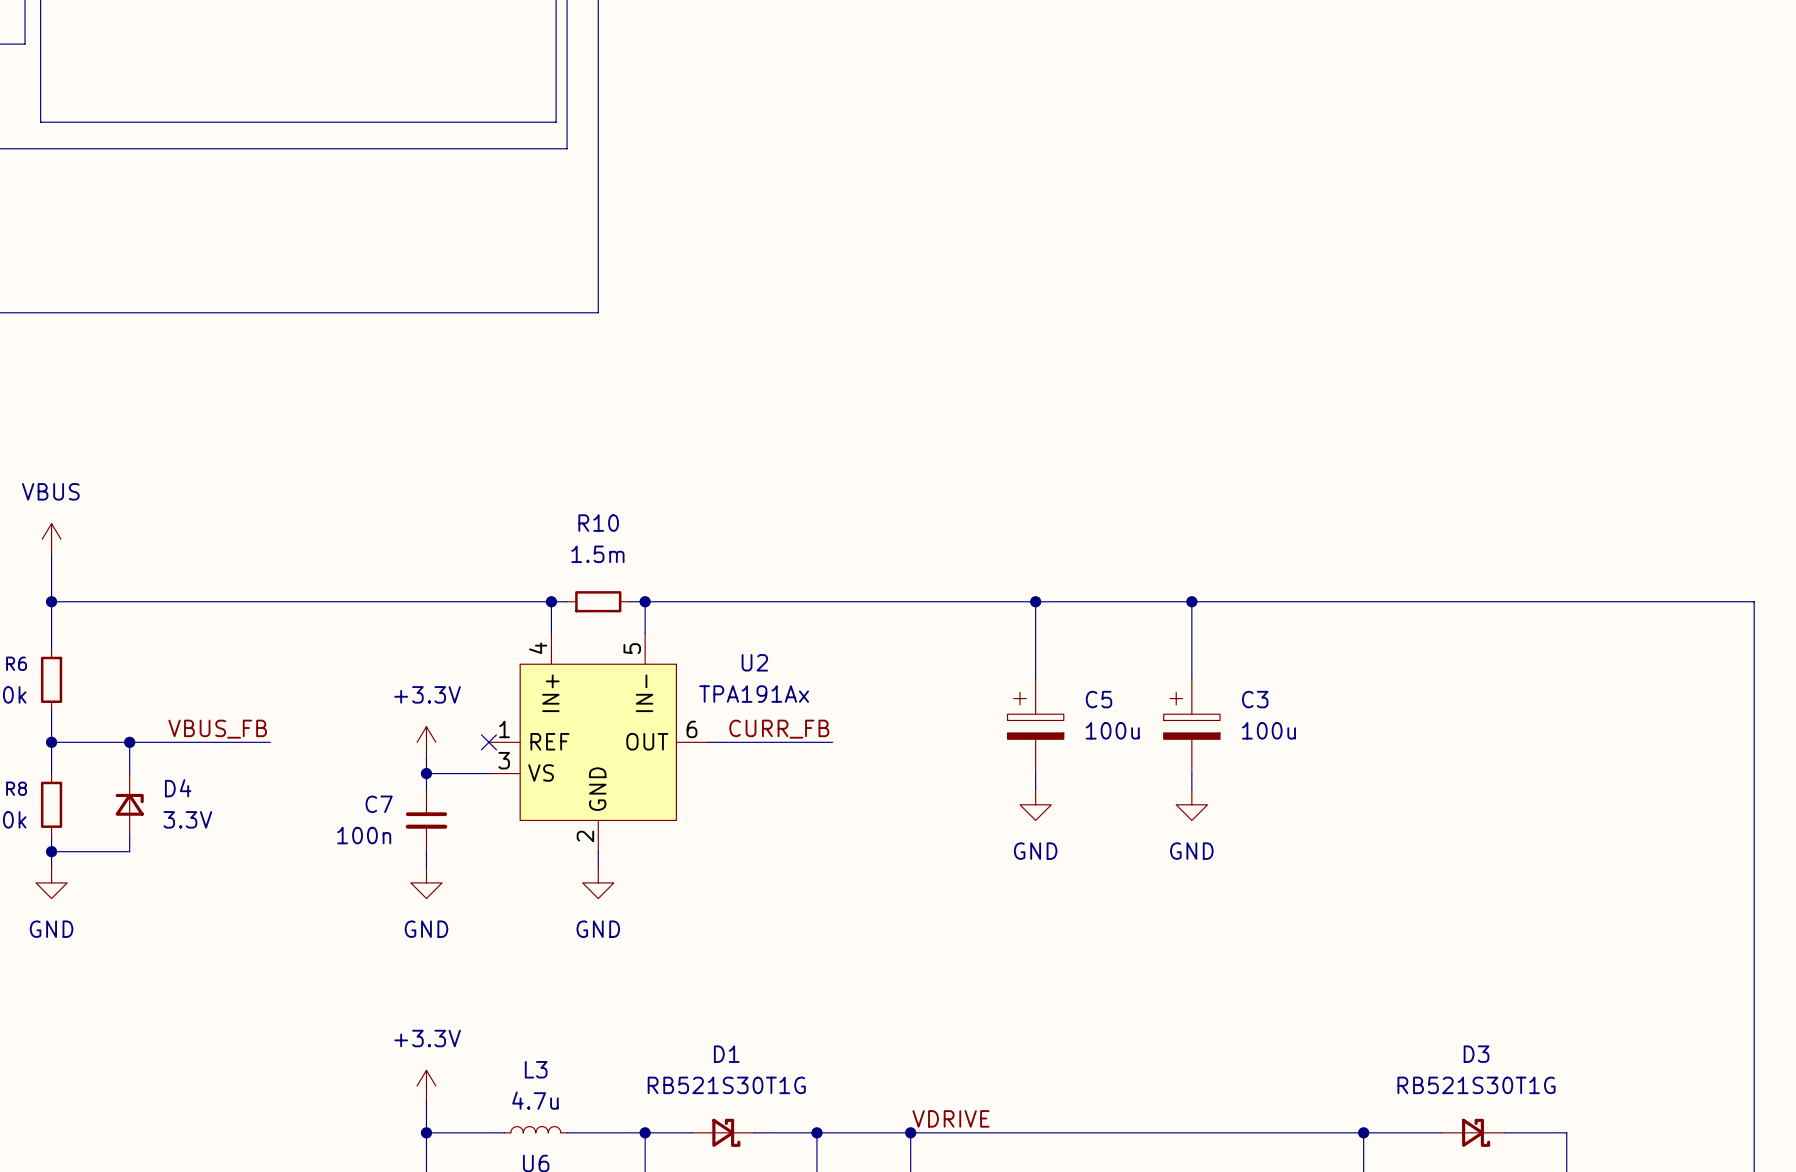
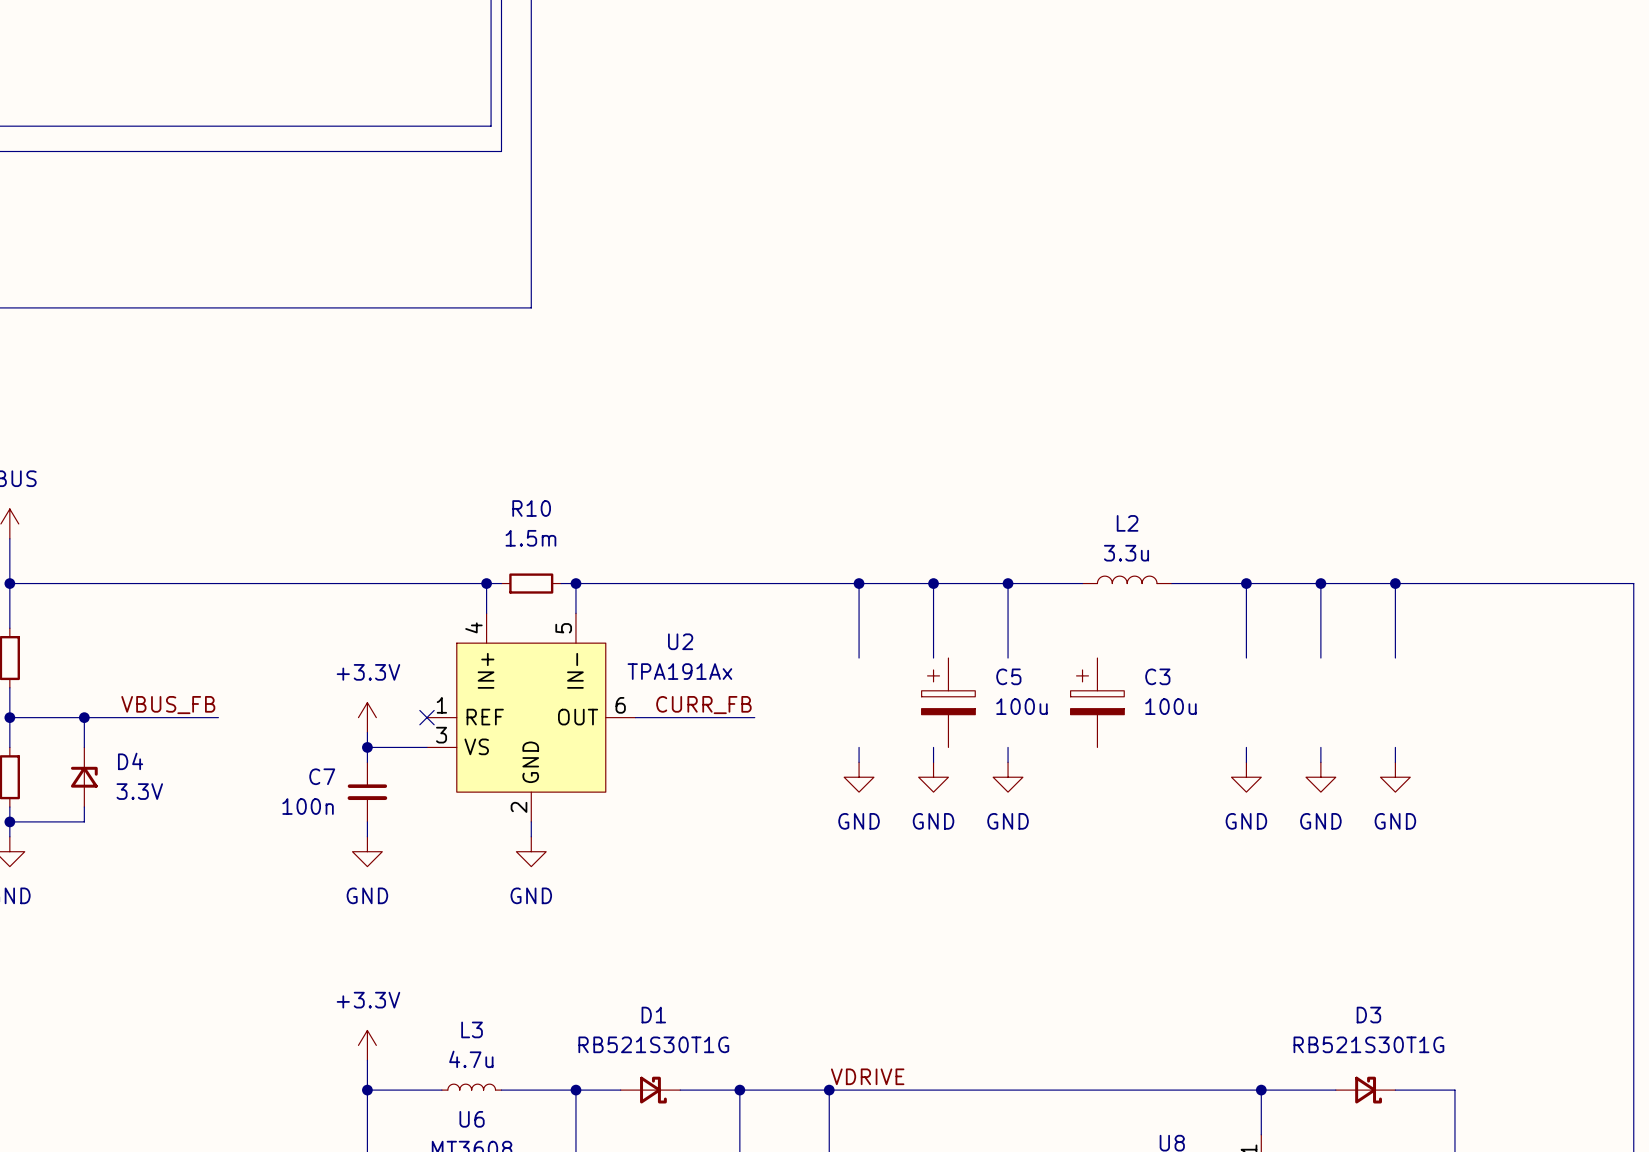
L2: none -> 3.3u (1127, 579)
junction: none -> (859, 583)
wire: none -> (933, 583) (933, 658)
wire: (1035, 601) (1035, 679) -> (859, 583) (859, 658)
junction position: (1035, 601) -> (933, 583)
junction: none -> (1008, 583)
wire: (1176, 601) (1269, 601) -> none
wire: (1191, 601) (1191, 679) -> (1008, 583) (1008, 658)
junction: (1191, 601) -> none
wire: none -> (1246, 583) (1246, 658)
junction: none -> (1246, 583)
wire: none -> (1320, 583) (1320, 658)
junction: none -> (1320, 583)
wire: none -> (1395, 583) (1395, 658)
junction: none -> (1395, 583)
wire: none -> (933, 747) (933, 762)
wire: (1035, 773) (1035, 789) -> (859, 747) (859, 762)
wire: (1191, 773) (1191, 789) -> (1008, 747) (1008, 762)
wire: none -> (1246, 747) (1246, 762)
wire: none -> (1320, 747) (1320, 762)
wire: none -> (1395, 747) (1395, 762)
power symbol: none -> GND (859, 777)
power symbol position: GND (1035, 804) -> GND (933, 777)
power symbol: none -> GND (1008, 777)
power symbol: GND (1191, 804) -> none
power symbol: none -> GND (1246, 777)
power symbol: none -> GND (1320, 777)
power symbol: none -> GND (1395, 777)

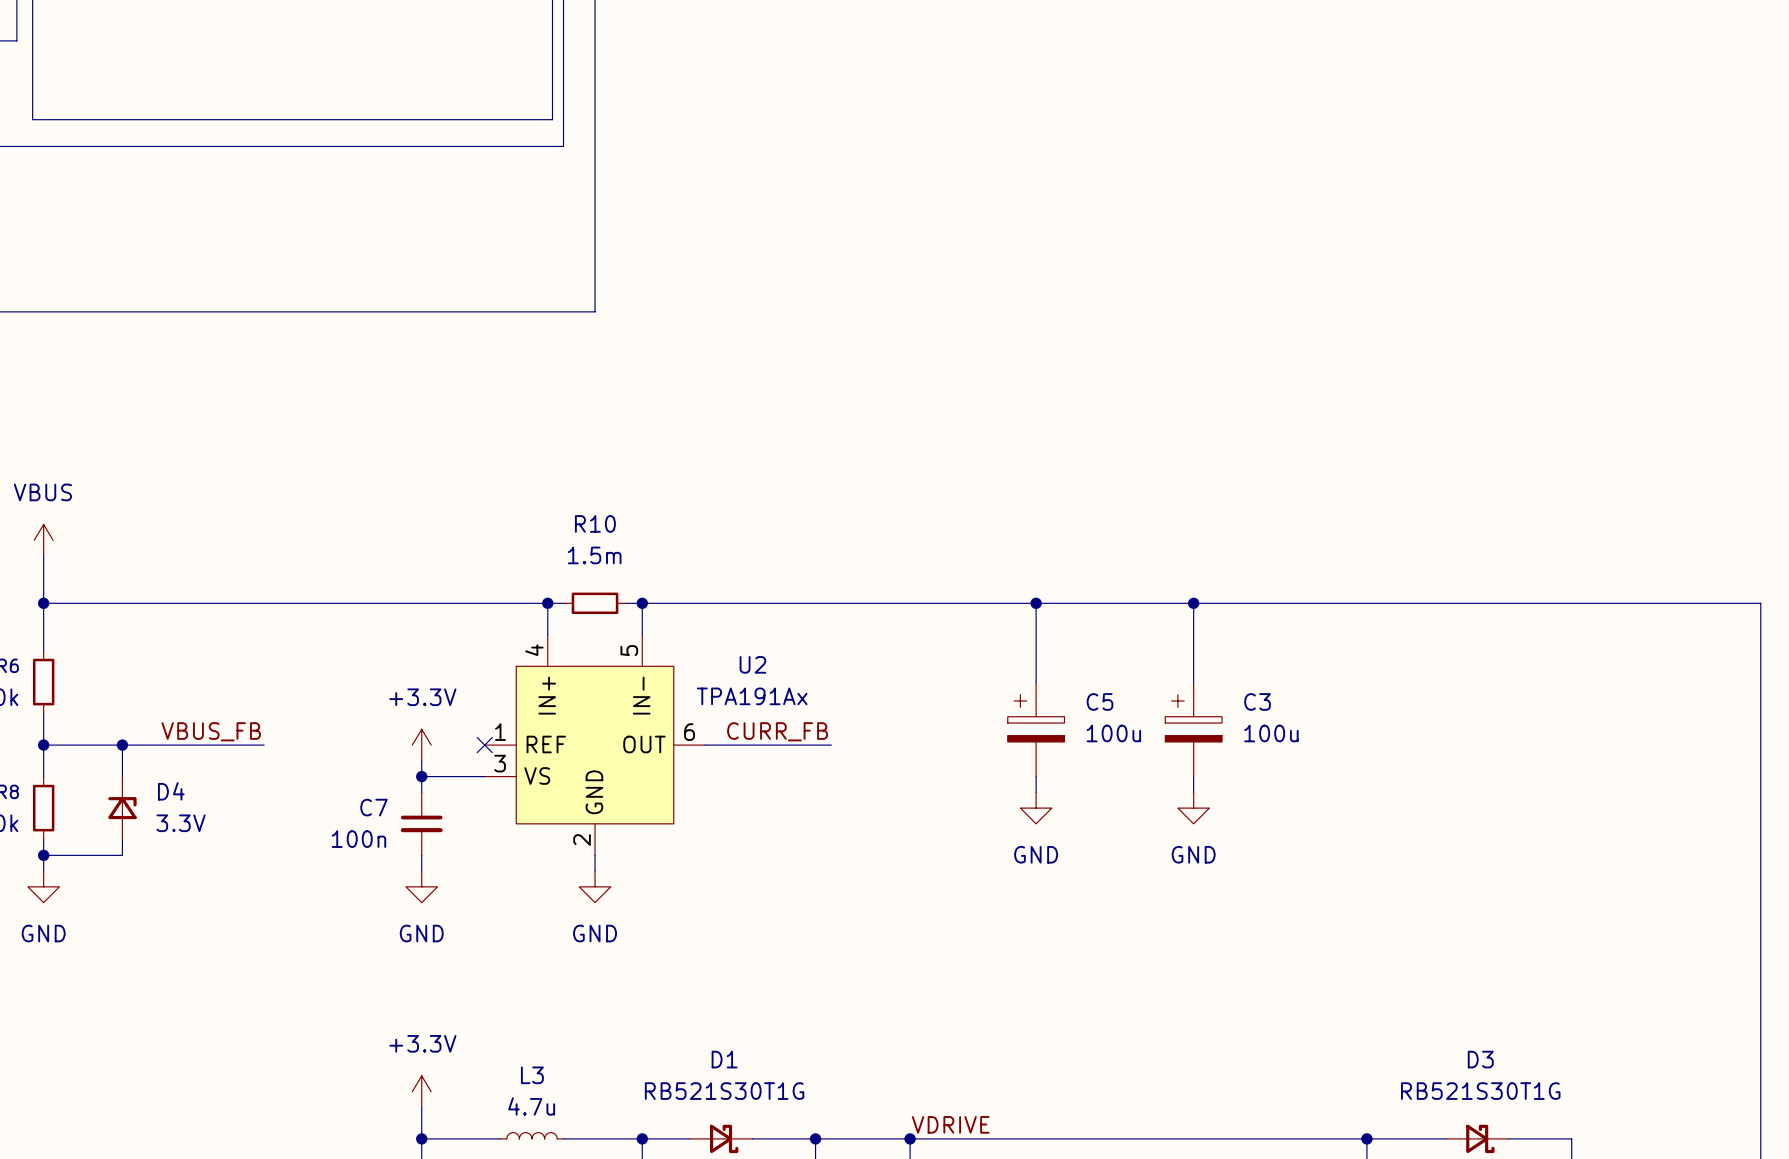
L2: 3.3u (1127, 579) -> none
wire: (859, 583) (859, 658) -> (1036, 603) (1036, 682)
junction: (859, 583) -> none
wire: (933, 583) (933, 658) -> none
junction position: (933, 583) -> (1036, 603)
wire: (1008, 583) (1008, 658) -> (1193, 603) (1193, 682)
junction: (1008, 583) -> none
wire: none -> (1177, 603) (1272, 603)
junction: none -> (1193, 603)
wire: (1246, 583) (1246, 658) -> none
junction: (1246, 583) -> none
wire: (1320, 583) (1320, 658) -> none
junction: (1320, 583) -> none
wire: (1395, 583) (1395, 658) -> none
junction: (1395, 583) -> none
wire: (859, 747) (859, 762) -> (1036, 776) (1036, 792)
wire: (933, 747) (933, 762) -> none
wire: (1008, 747) (1008, 762) -> (1193, 776) (1193, 792)
wire: (1246, 747) (1246, 762) -> none
wire: (1320, 747) (1320, 762) -> none
wire: (1395, 747) (1395, 762) -> none
power symbol: GND (859, 777) -> none
power symbol position: GND (933, 777) -> GND (1036, 808)
power symbol: GND (1008, 777) -> none
power symbol: none -> GND (1193, 808)
power symbol: GND (1246, 777) -> none
power symbol: GND (1320, 777) -> none
power symbol: GND (1395, 777) -> none

